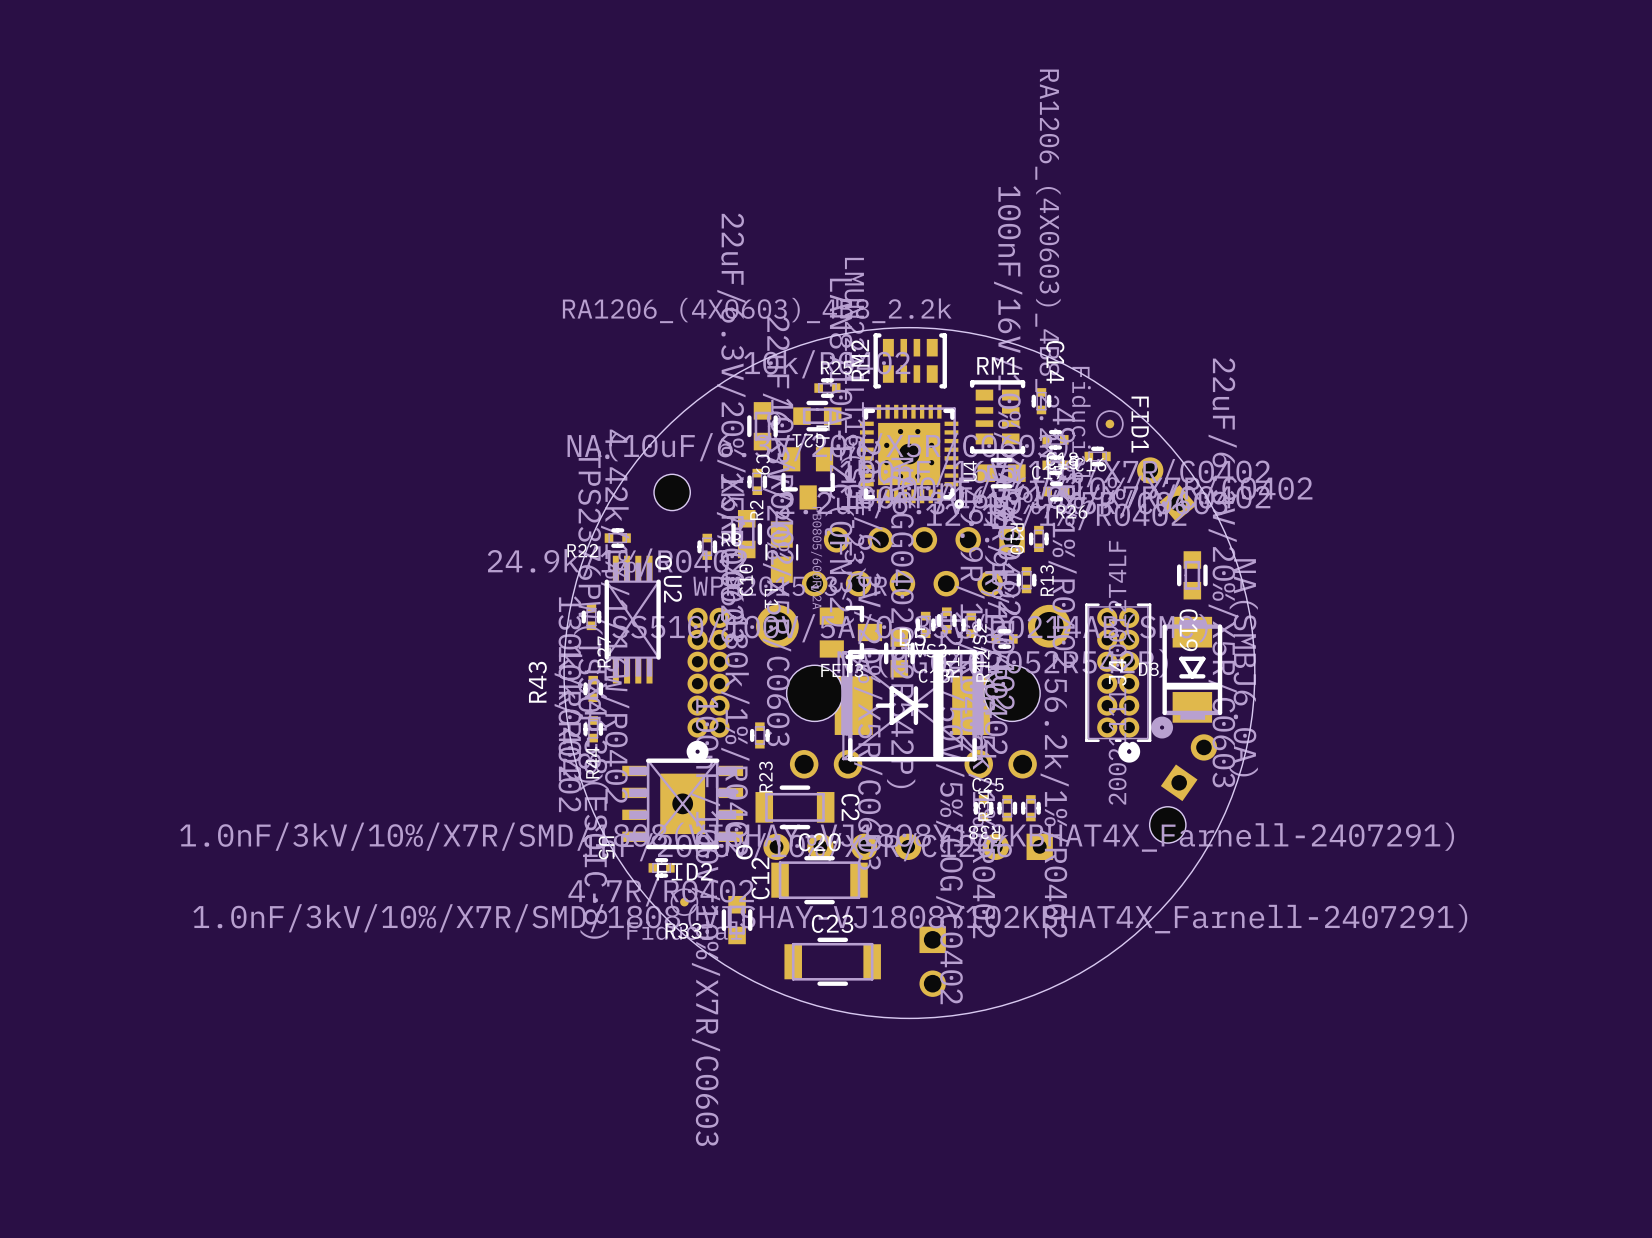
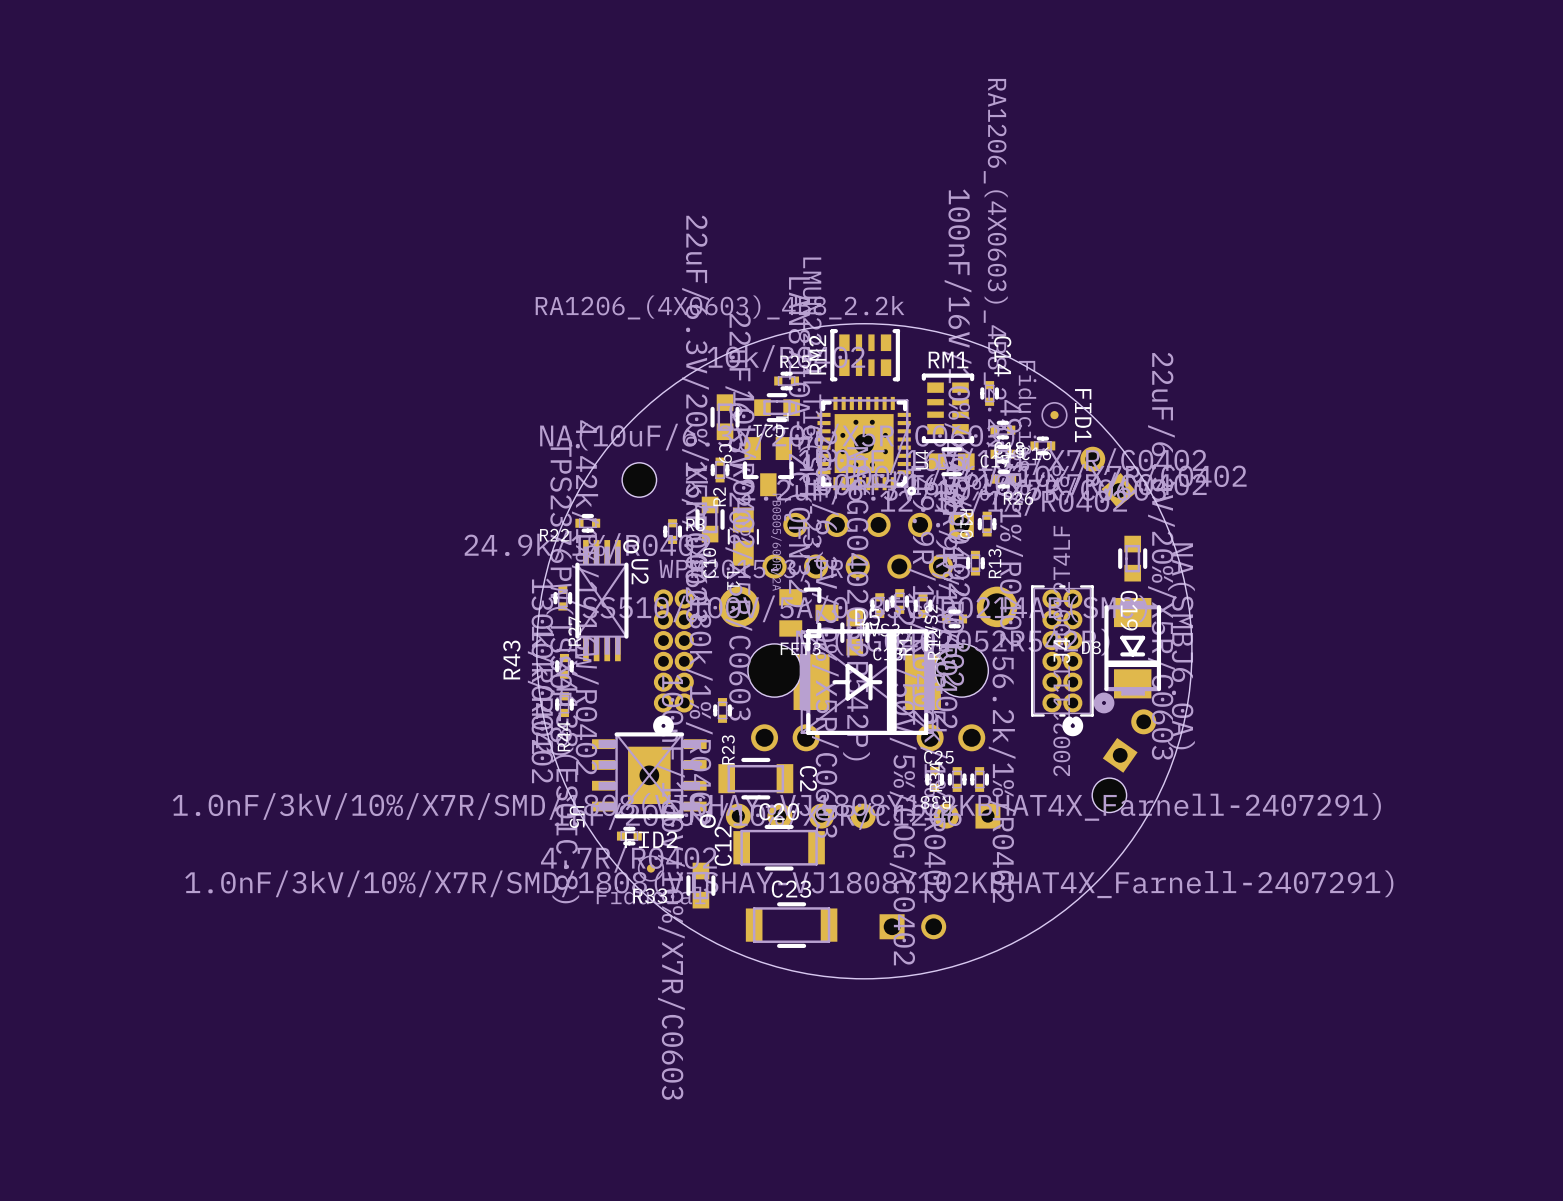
part rotation: 0° (932, 961) -> 90° counterclockwise (912, 926)

